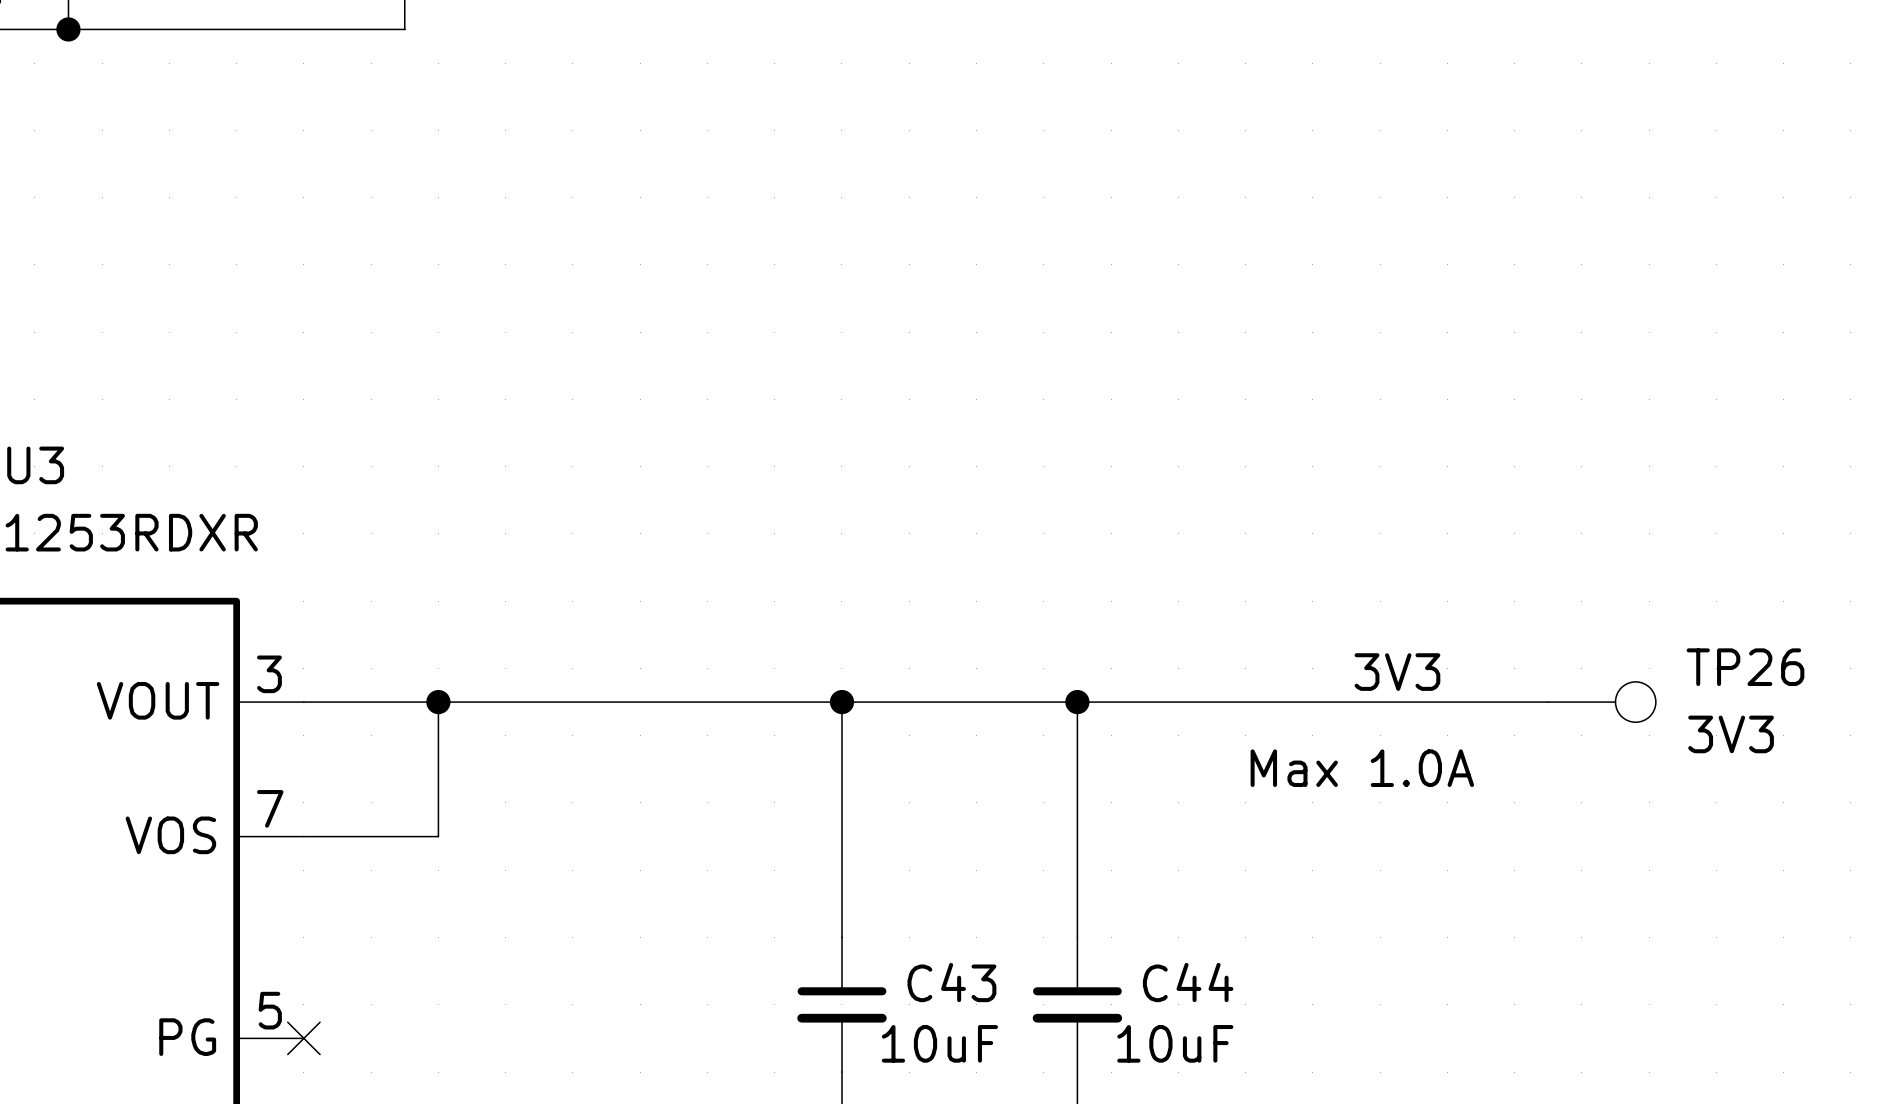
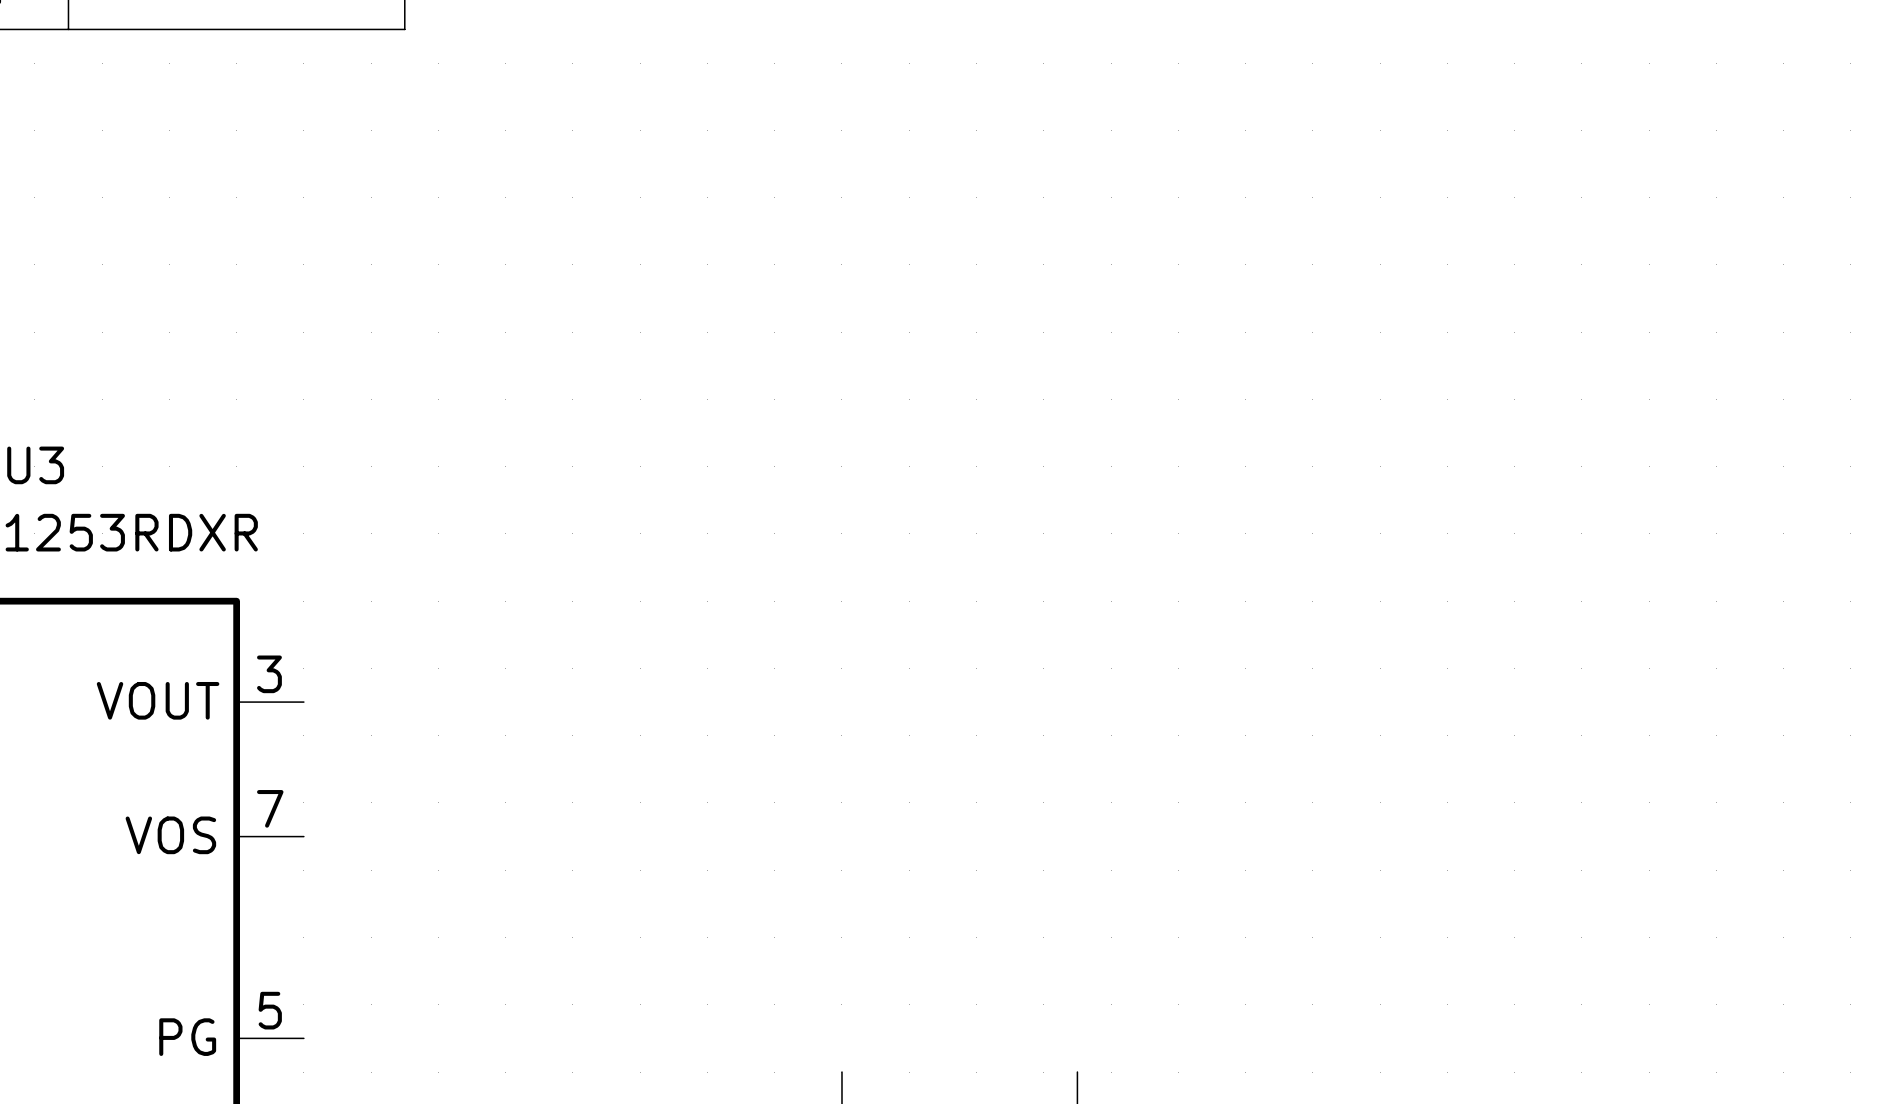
junction: (68, 29) -> none
label: 3V3 (1397, 672) -> none
wire: (303, 702) (1548, 702) -> none
wire: (438, 702) (438, 836) (303, 836) -> none
junction: (438, 702) -> none
wire: (841, 702) (841, 937) -> none
junction: (841, 702) -> none
wire: (1077, 702) (1077, 937) -> none
junction: (1077, 702) -> none
TP26: 3V3 (1602, 702) -> none
text: Max 1.0A (1362, 768) -> none
C43: 10uF (841, 1004) -> none
C44: 10uF (1077, 1004) -> none
no-connect mark: (303, 1038) -> none

